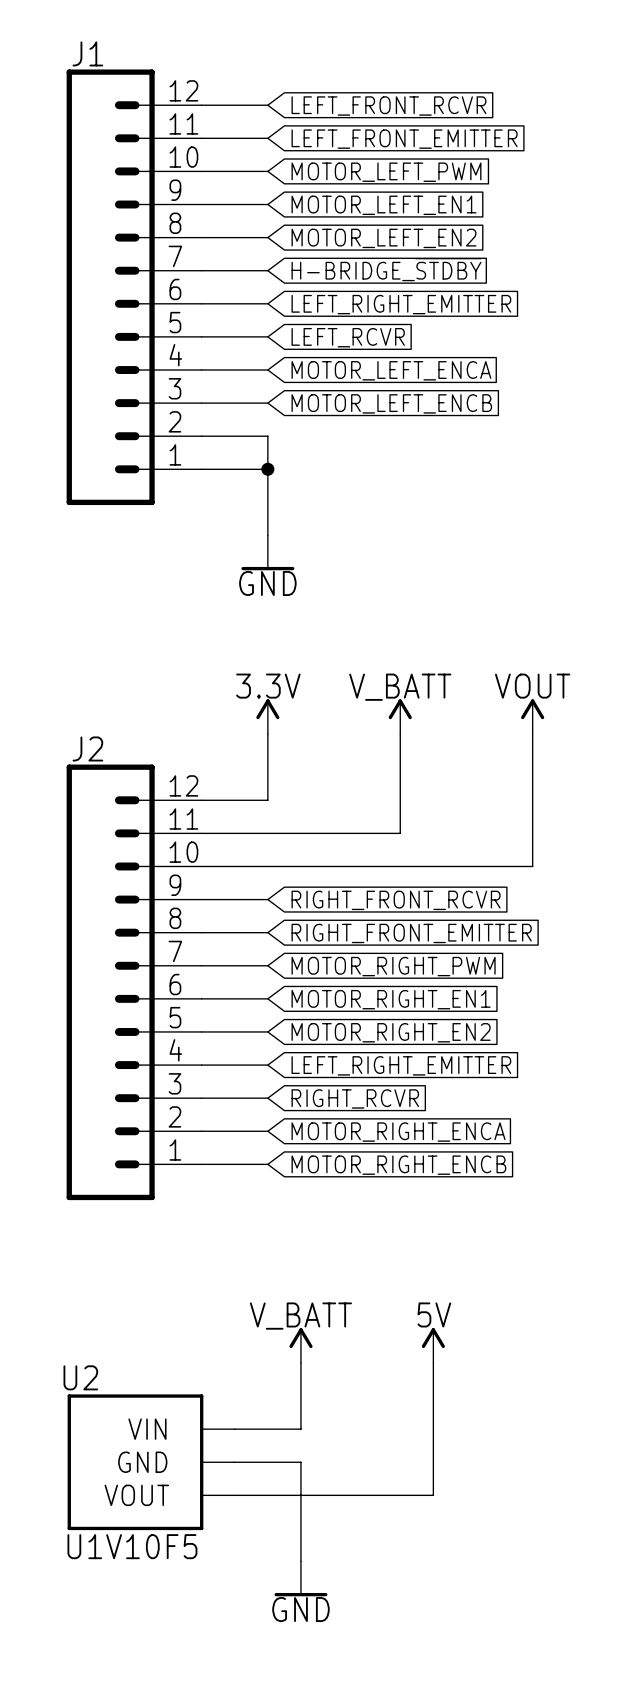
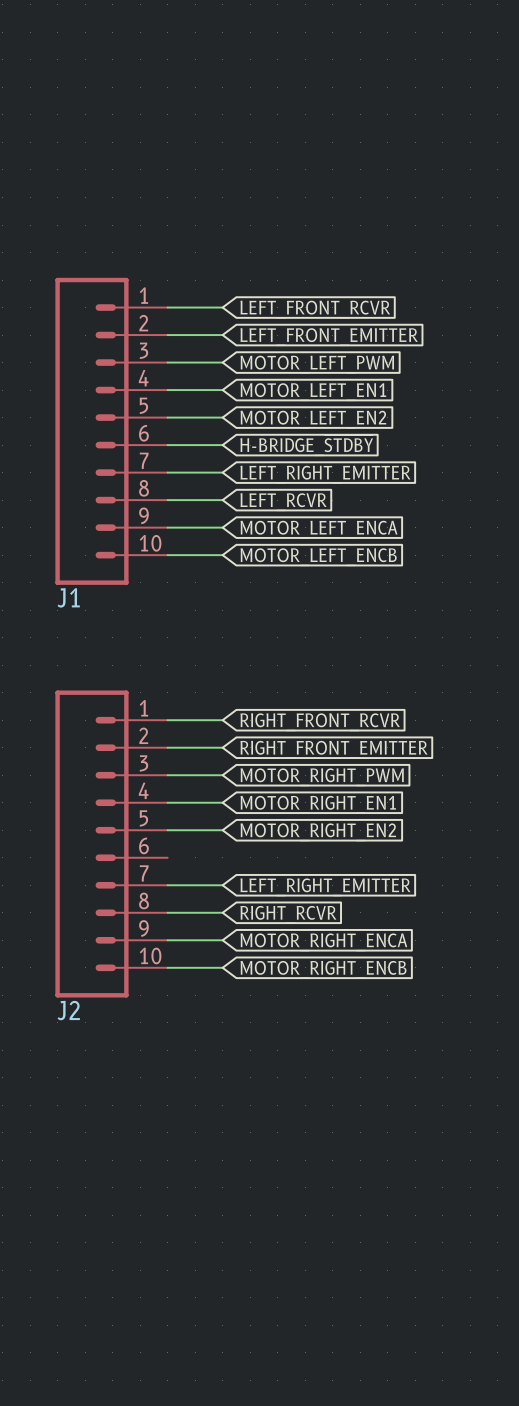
J1 name position: J1 (87, 53) -> J1 (68, 597)
J1 symbol: [66, 69, 202, 506] -> [55, 277, 168, 585]
wire: (201, 105) (267, 105) -> none
global label: LEFT_FRONT_RCVR (388, 106) -> none
wire: (201, 138) (267, 138) -> none
global label: LEFT_FRONT_EMITTER (404, 139) -> none
wire: (201, 171) (267, 171) -> none
global label position: MOTOR_LEFT_PWM (386, 172) -> MOTOR_LEFT_PWM (317, 364)
wire: (201, 204) (267, 204) -> (167, 417) (222, 417)
global label position: MOTOR_LEFT_EN1 (384, 205) -> MOTOR_LEFT_EN1 (313, 392)
wire: (201, 237) (267, 237) -> none
global label position: MOTOR_LEFT_EN2 (384, 238) -> MOTOR_LEFT_EN2 (313, 419)
global label position: H-BRIDGE_~{STDBY} (386, 269) -> H-BRIDGE_~{STDBY} (306, 445)
wire: (201, 270) (267, 270) -> (167, 472) (222, 472)
wire: (201, 303) (267, 303) -> (167, 500) (222, 500)
global label position: LEFT_RIGHT_EMITTER (401, 304) -> LEFT_RIGHT_EMITTER (325, 474)
wire: (201, 336) (267, 336) -> (167, 527) (222, 527)
global label position: LEFT_RCVR (348, 337) -> LEFT_RCVR (283, 502)
global label: MOTOR_LEFT_ENCA (391, 370) -> LEFT_FRONT_RCVR (315, 309)
global label: MOTOR_LEFT_ENCB (391, 403) -> LEFT_FRONT_EMITTER (329, 337)
wire: (267, 436) (267, 535) -> (167, 445) (222, 445)
junction: (267, 469) -> none
power symbol: GND (267, 552) -> none
global label: none -> MOTOR_LEFT_ENCA (319, 529)
wire: none -> (167, 555) (222, 555)
global label: none -> MOTOR_LEFT_ENCB (318, 557)
power symbol: 3.3V (267, 716) -> none
power symbol: V_BATT (400, 716) -> none
power symbol: VOUT (532, 716) -> none
wire: (267, 734) (267, 800) (201, 800) -> none
wire: (400, 734) (400, 833) (201, 833) -> none
wire: (532, 734) (532, 866) (267, 866) -> none
J2 name position: J2 (87, 748) -> J2 (68, 1010)
J2 symbol: [66, 764, 202, 1201] -> [55, 690, 168, 998]
global label: none -> RIGHT_FRONT_RCVR (320, 722)
global label: RIGHT_FRONT_RCVR (396, 900) -> RIGHT_FRONT_EMITTER (334, 749)
global label: RIGHT_FRONT_EMITTER (411, 933) -> MOTOR_RIGHT_PWM (322, 777)
global label: MOTOR_RIGHT_PWM (393, 966) -> MOTOR_RIGHT_EN1 (318, 804)
global label: MOTOR_RIGHT_EN1 (391, 999) -> MOTOR_RIGHT_EN2 (318, 832)
wire: (201, 1031) (267, 1031) -> none
global label: MOTOR_RIGHT_EN2 (391, 1032) -> none
power symbol: V_BATT (300, 1345) -> none
power symbol: 5V (433, 1345) -> none
wire: (300, 1362) (300, 1429) (234, 1429) -> none
wire: (433, 1362) (433, 1495) (234, 1495) -> none
U2: U1V10F5 (151, 1462) -> none
wire: (234, 1462) (300, 1462) (300, 1561) -> none
power symbol: GND (300, 1578) -> none

